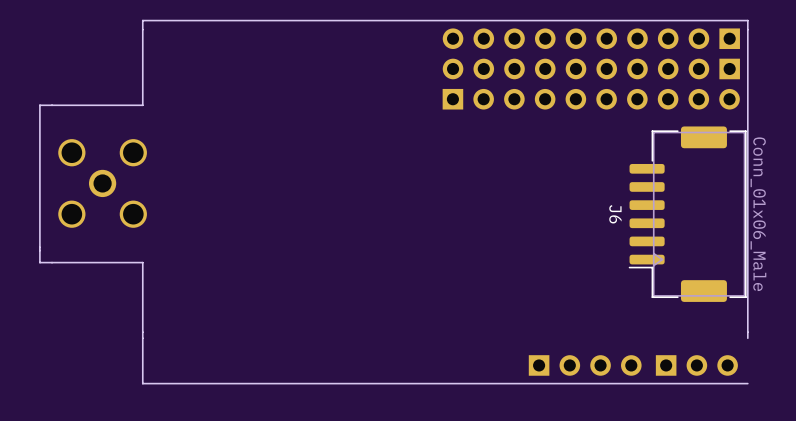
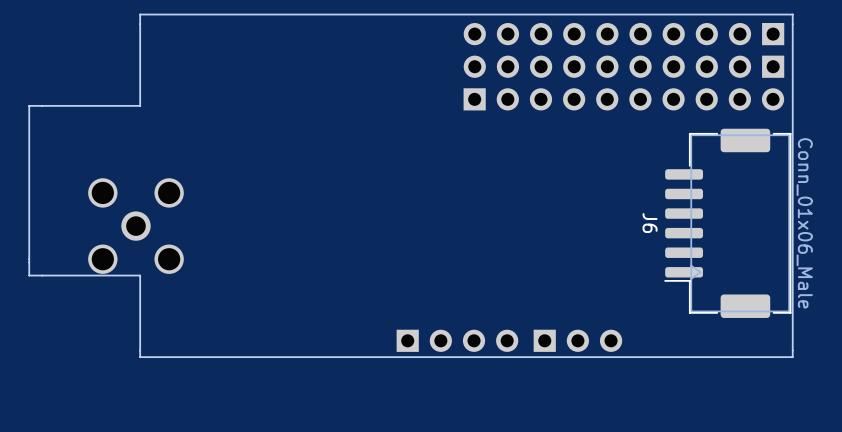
part position: (102, 183) -> (135, 226)
board edge: (142, 338) (142, 383) (747, 383) -> (140, 357) (792, 357)
part position: (585, 365) -> (457, 340)
part position: (696, 365) -> (577, 340)

